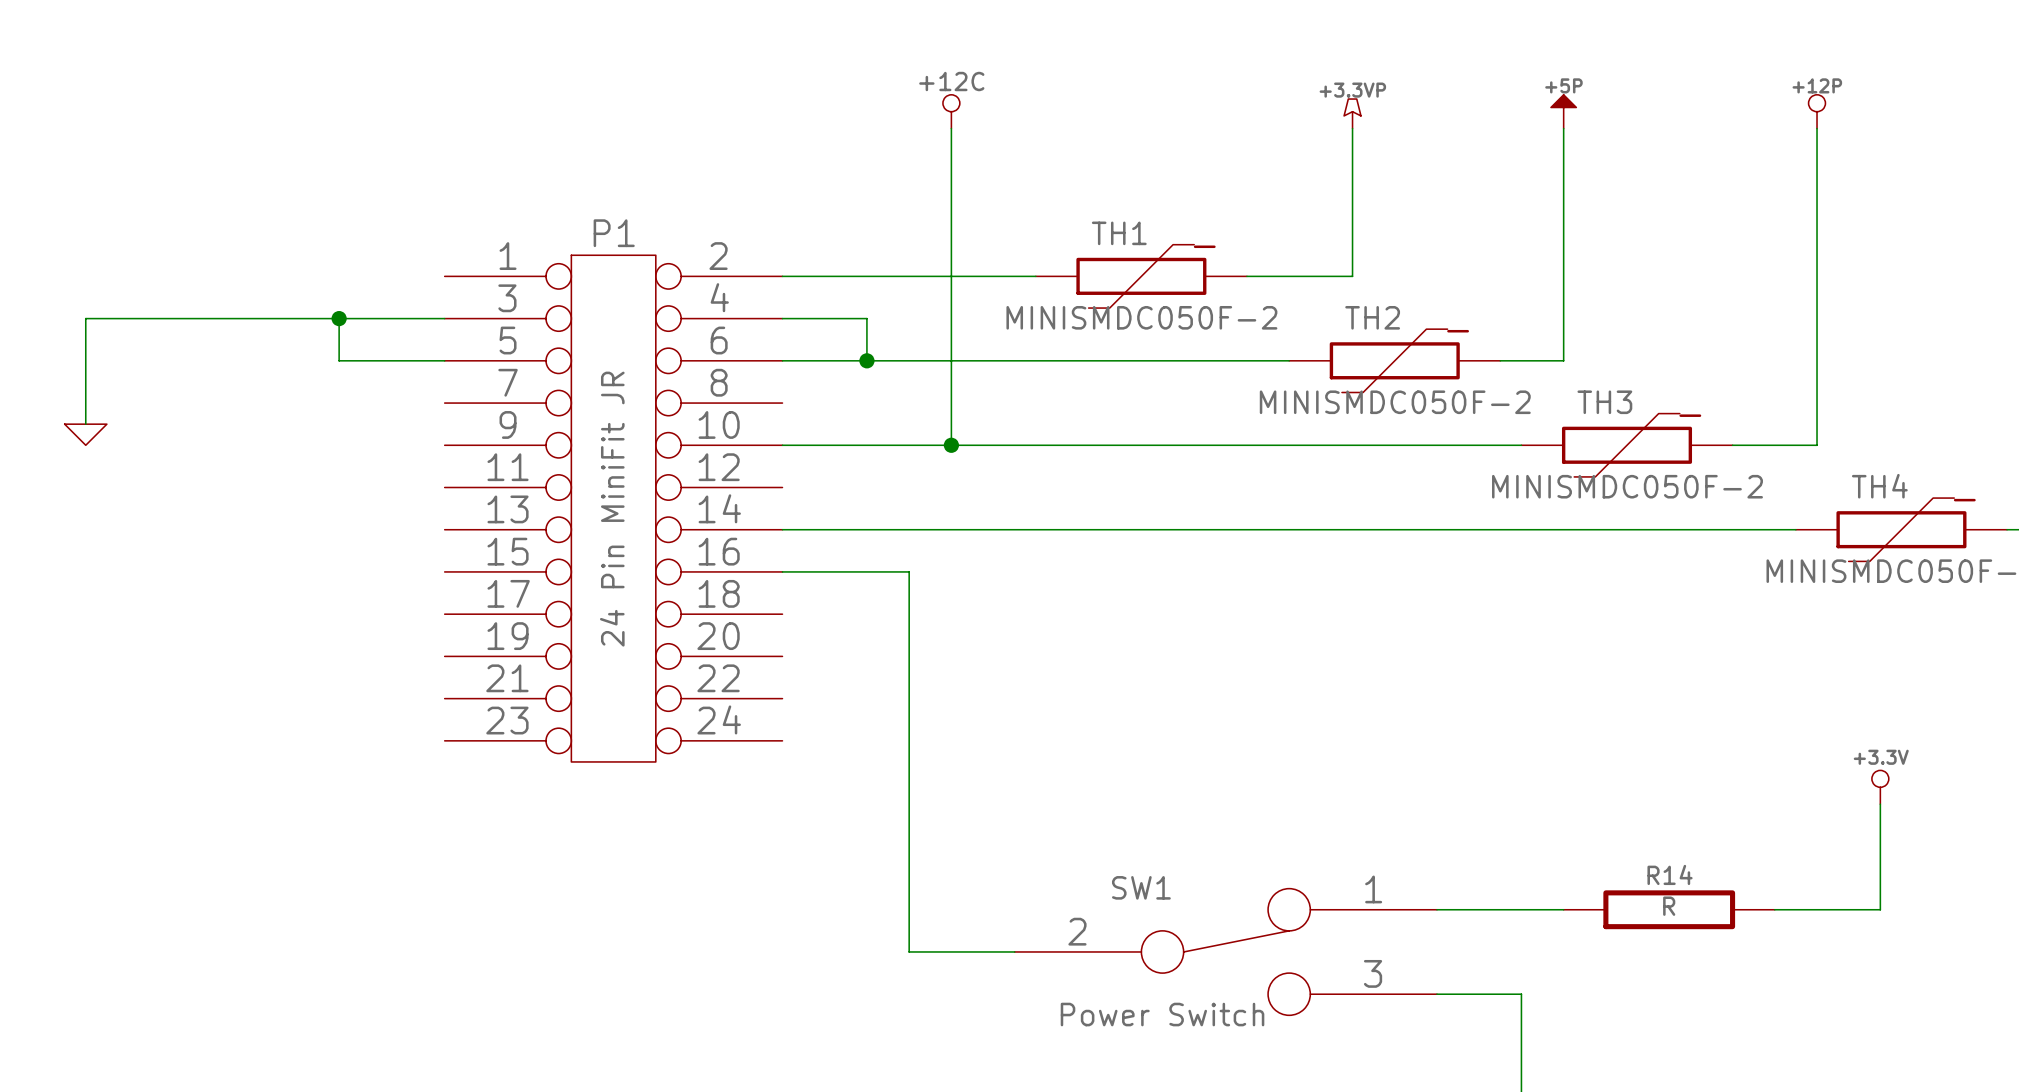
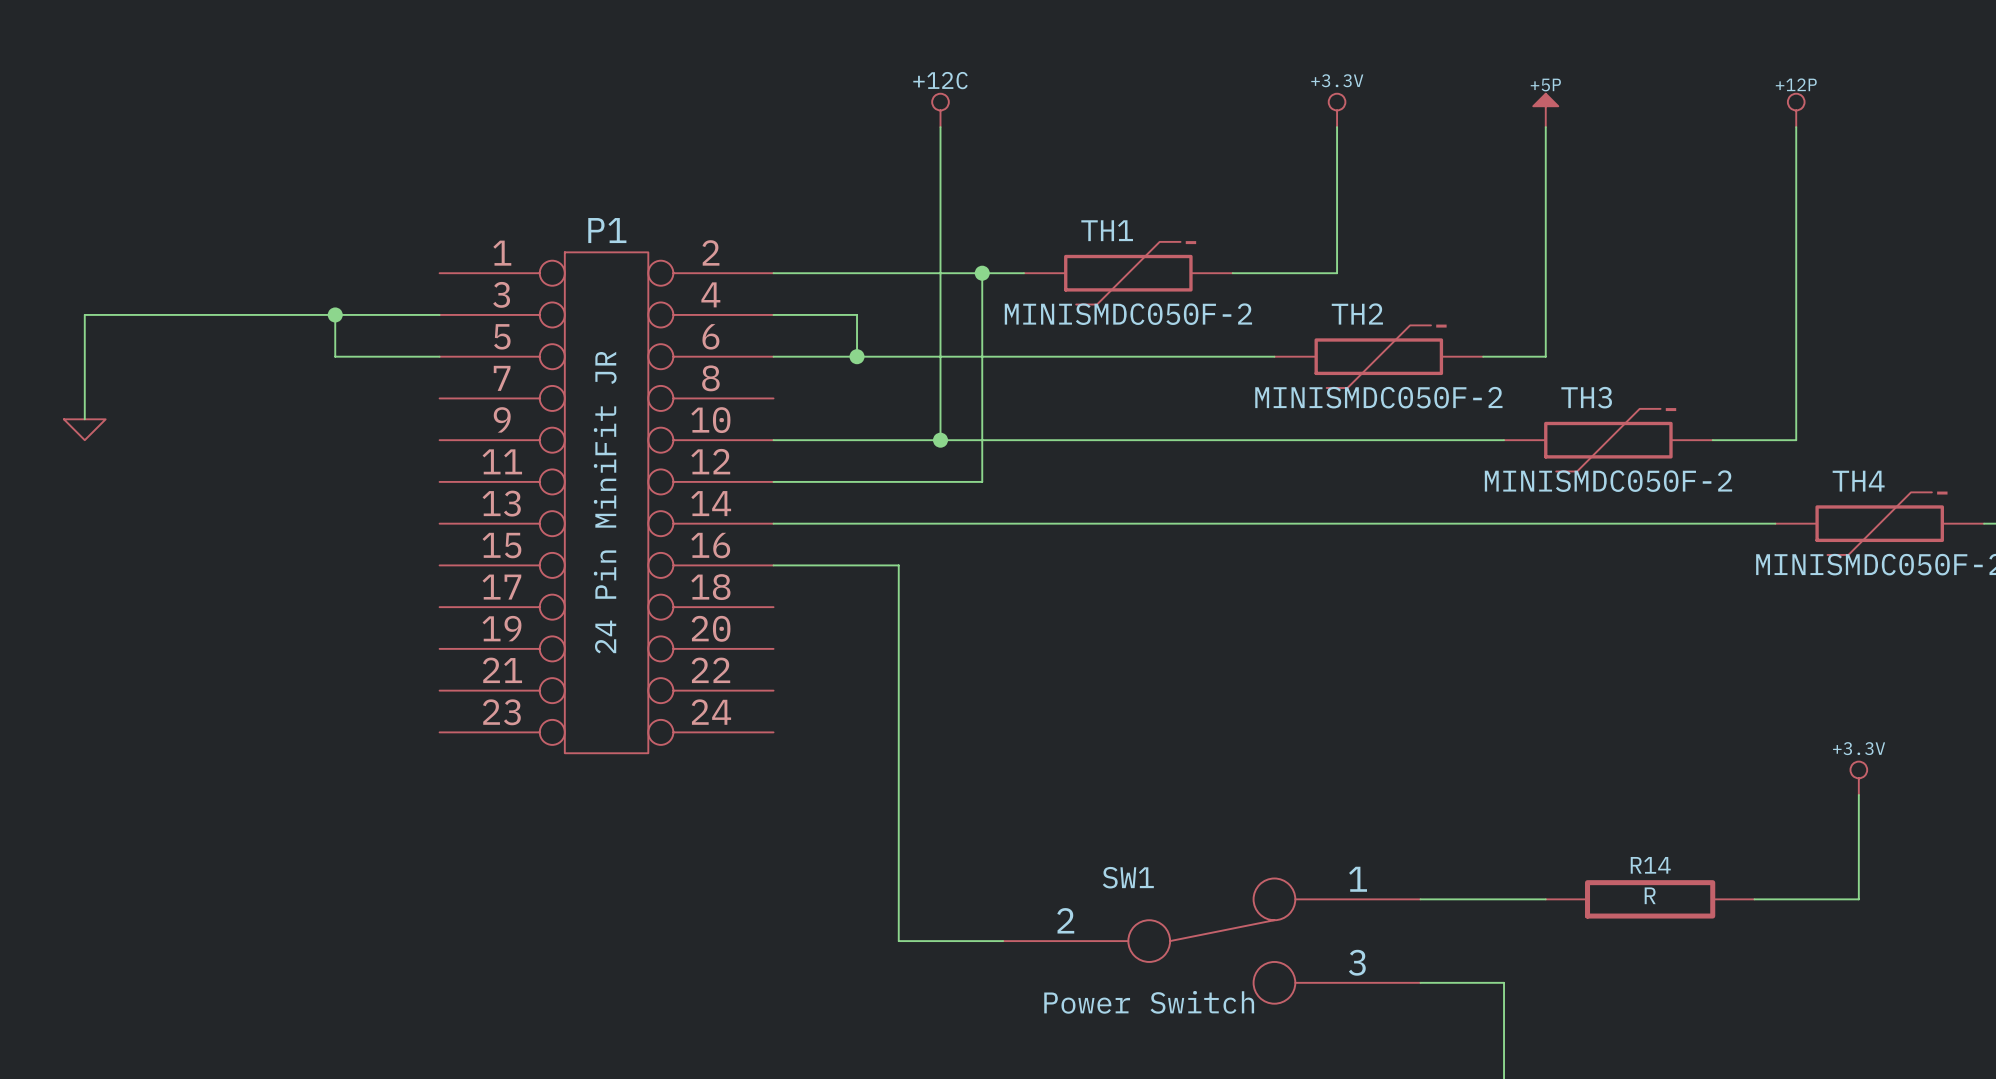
power symbol: +3.3VP (1352, 113) -> +3.3V (1337, 110)
wire: none -> (982, 273) (982, 481) (773, 481)
junction: none -> (982, 273)

